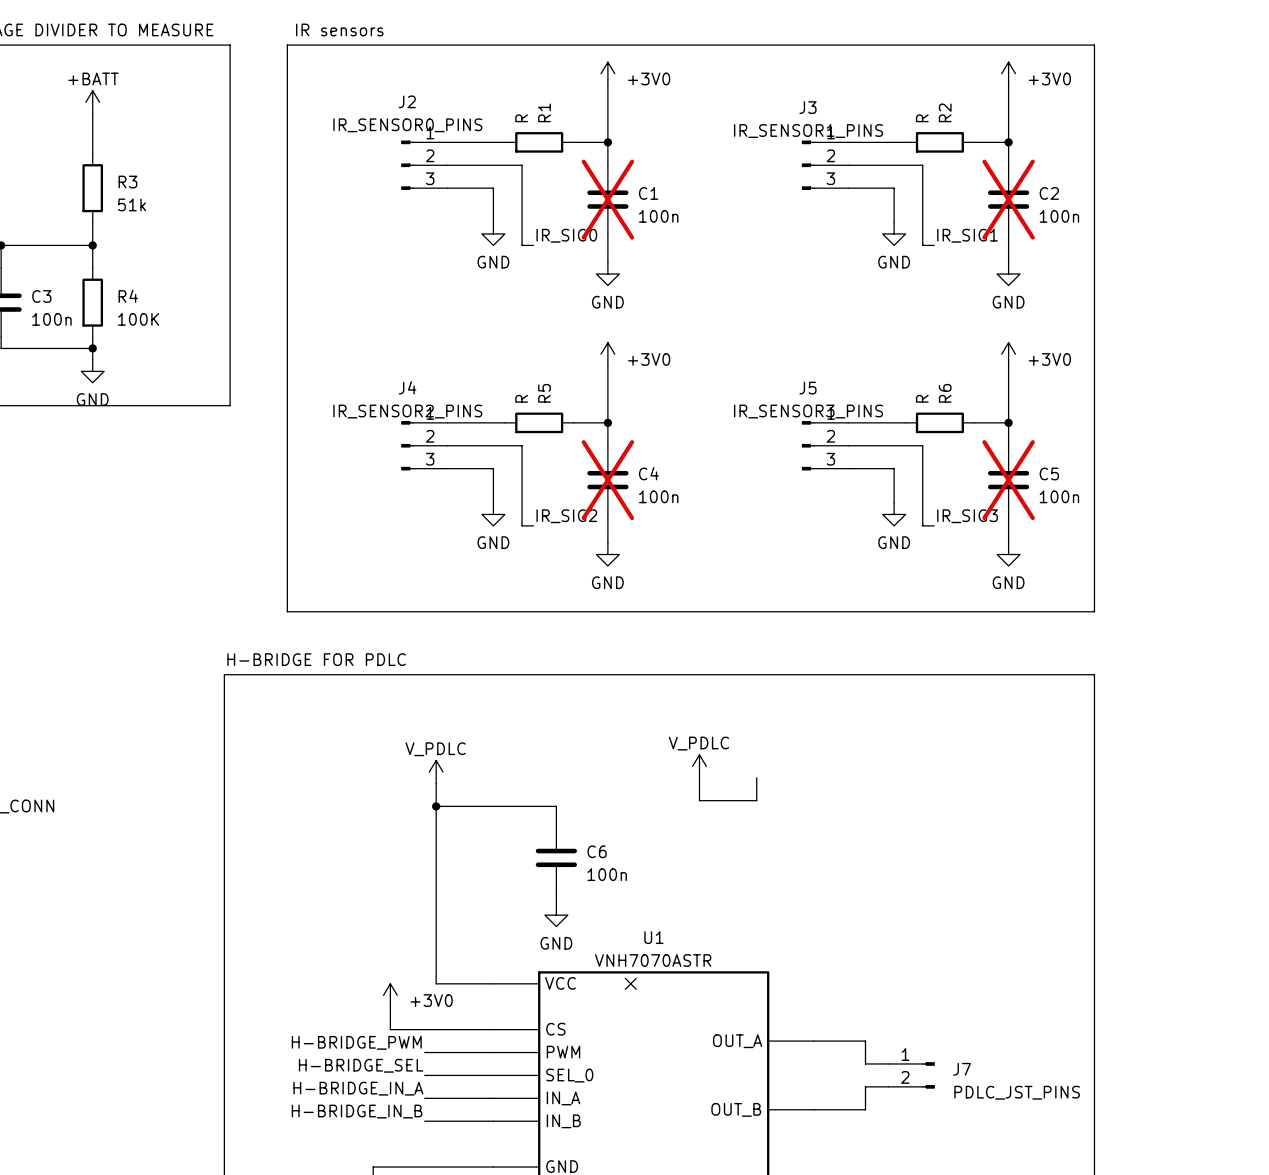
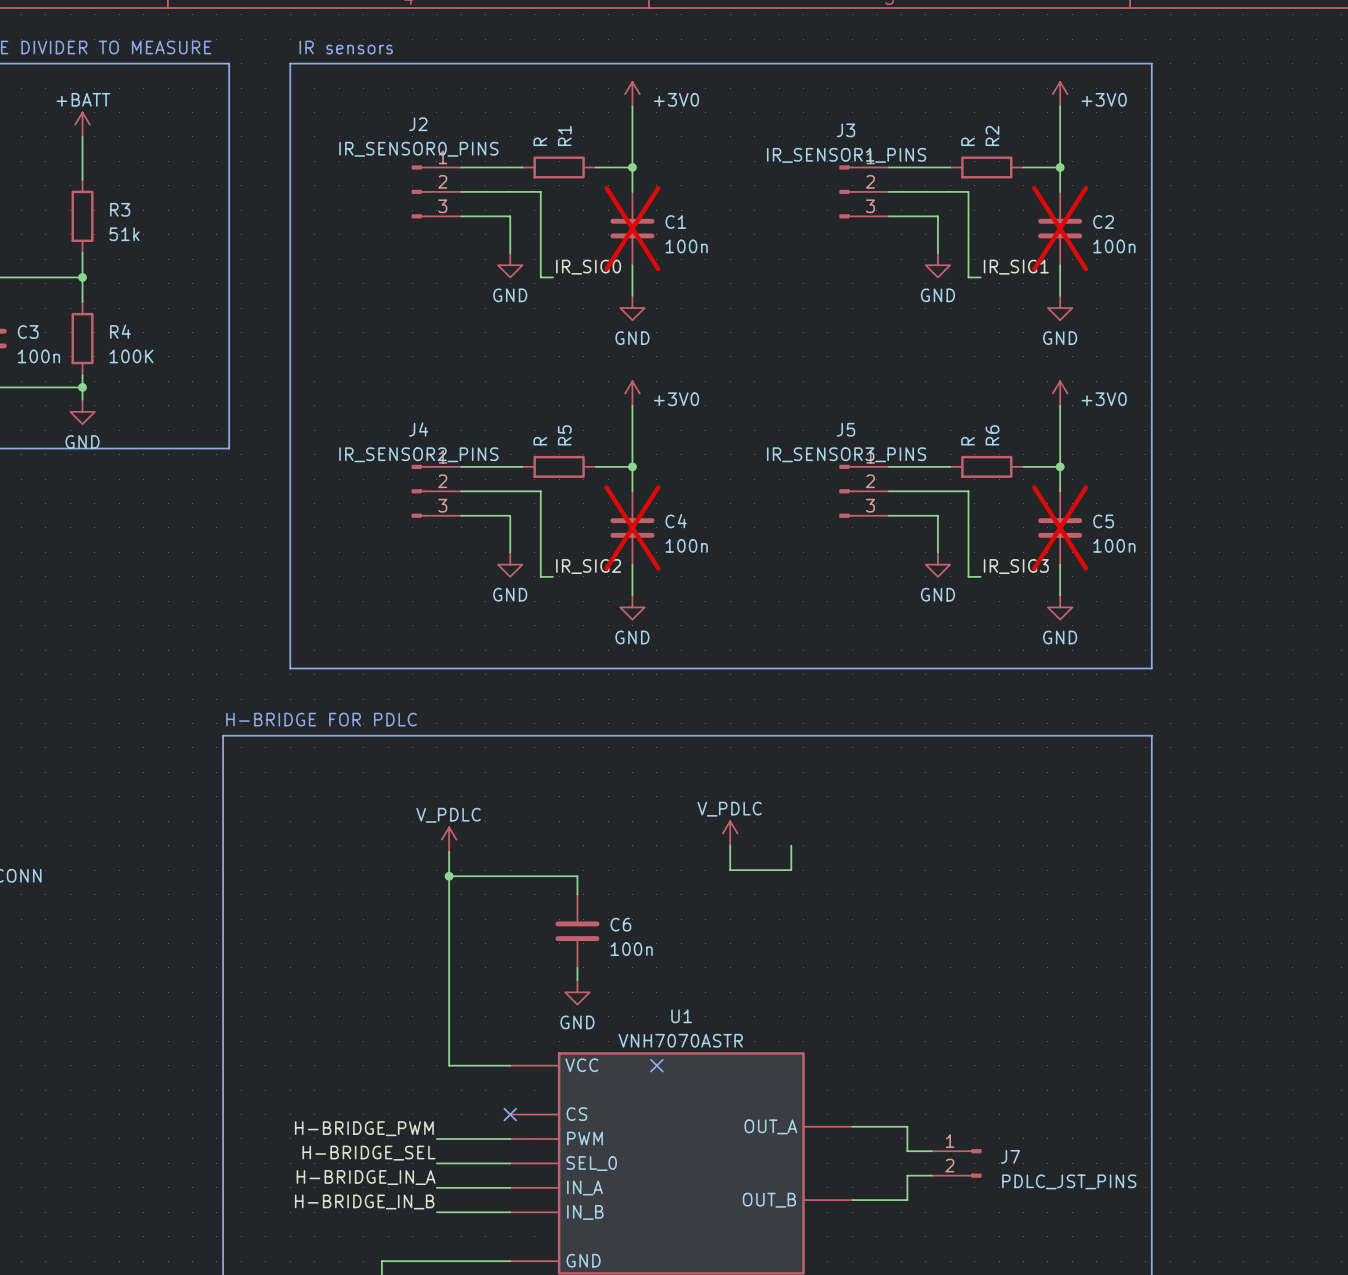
power symbol: +3V0 (390, 995) -> none
wire: (390, 1006) (390, 1029) (493, 1029) -> none
no-connect mark: none -> (510, 1114)

